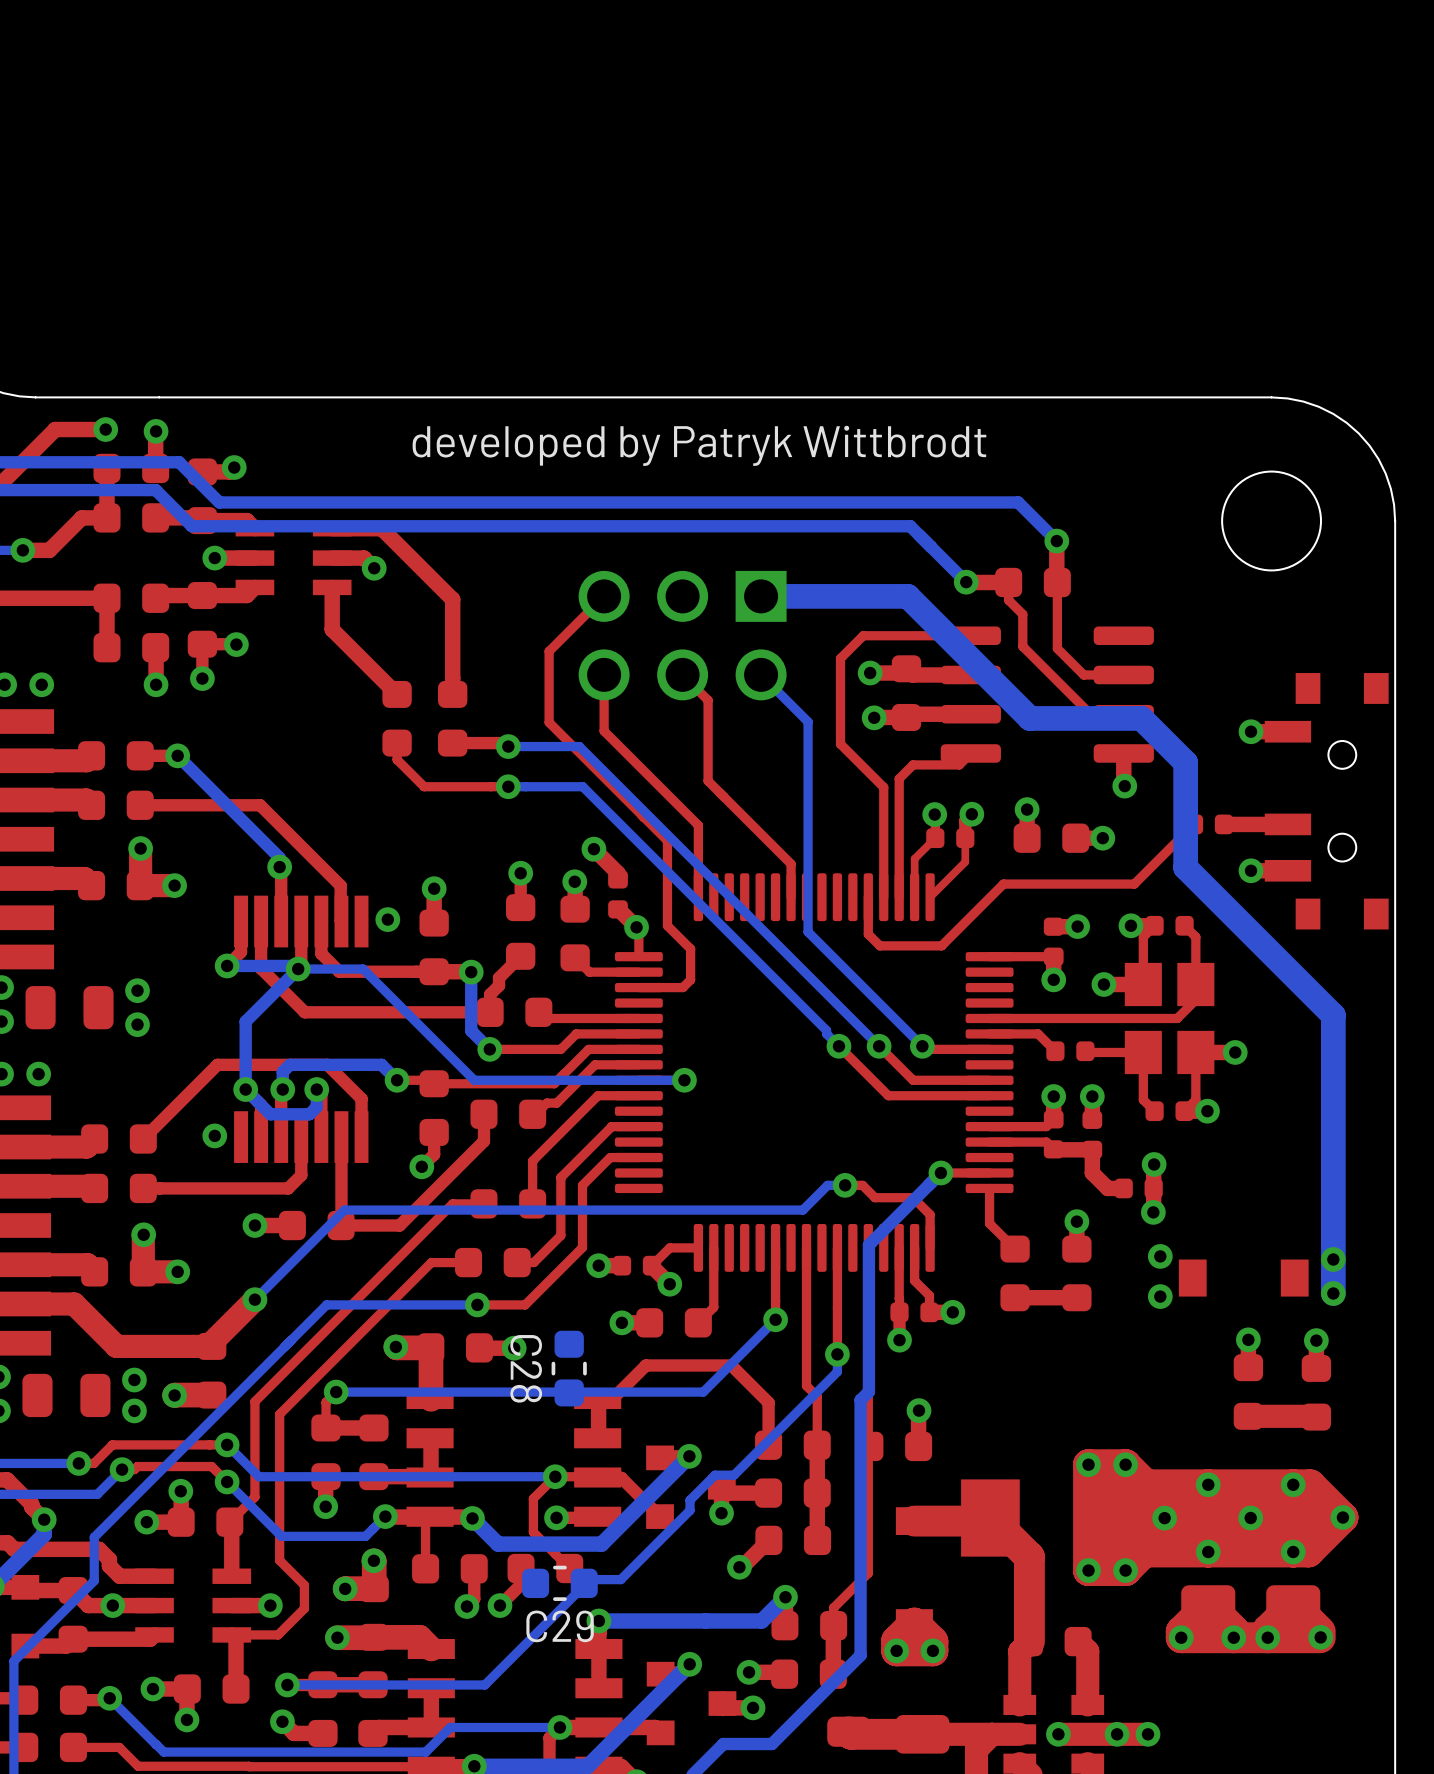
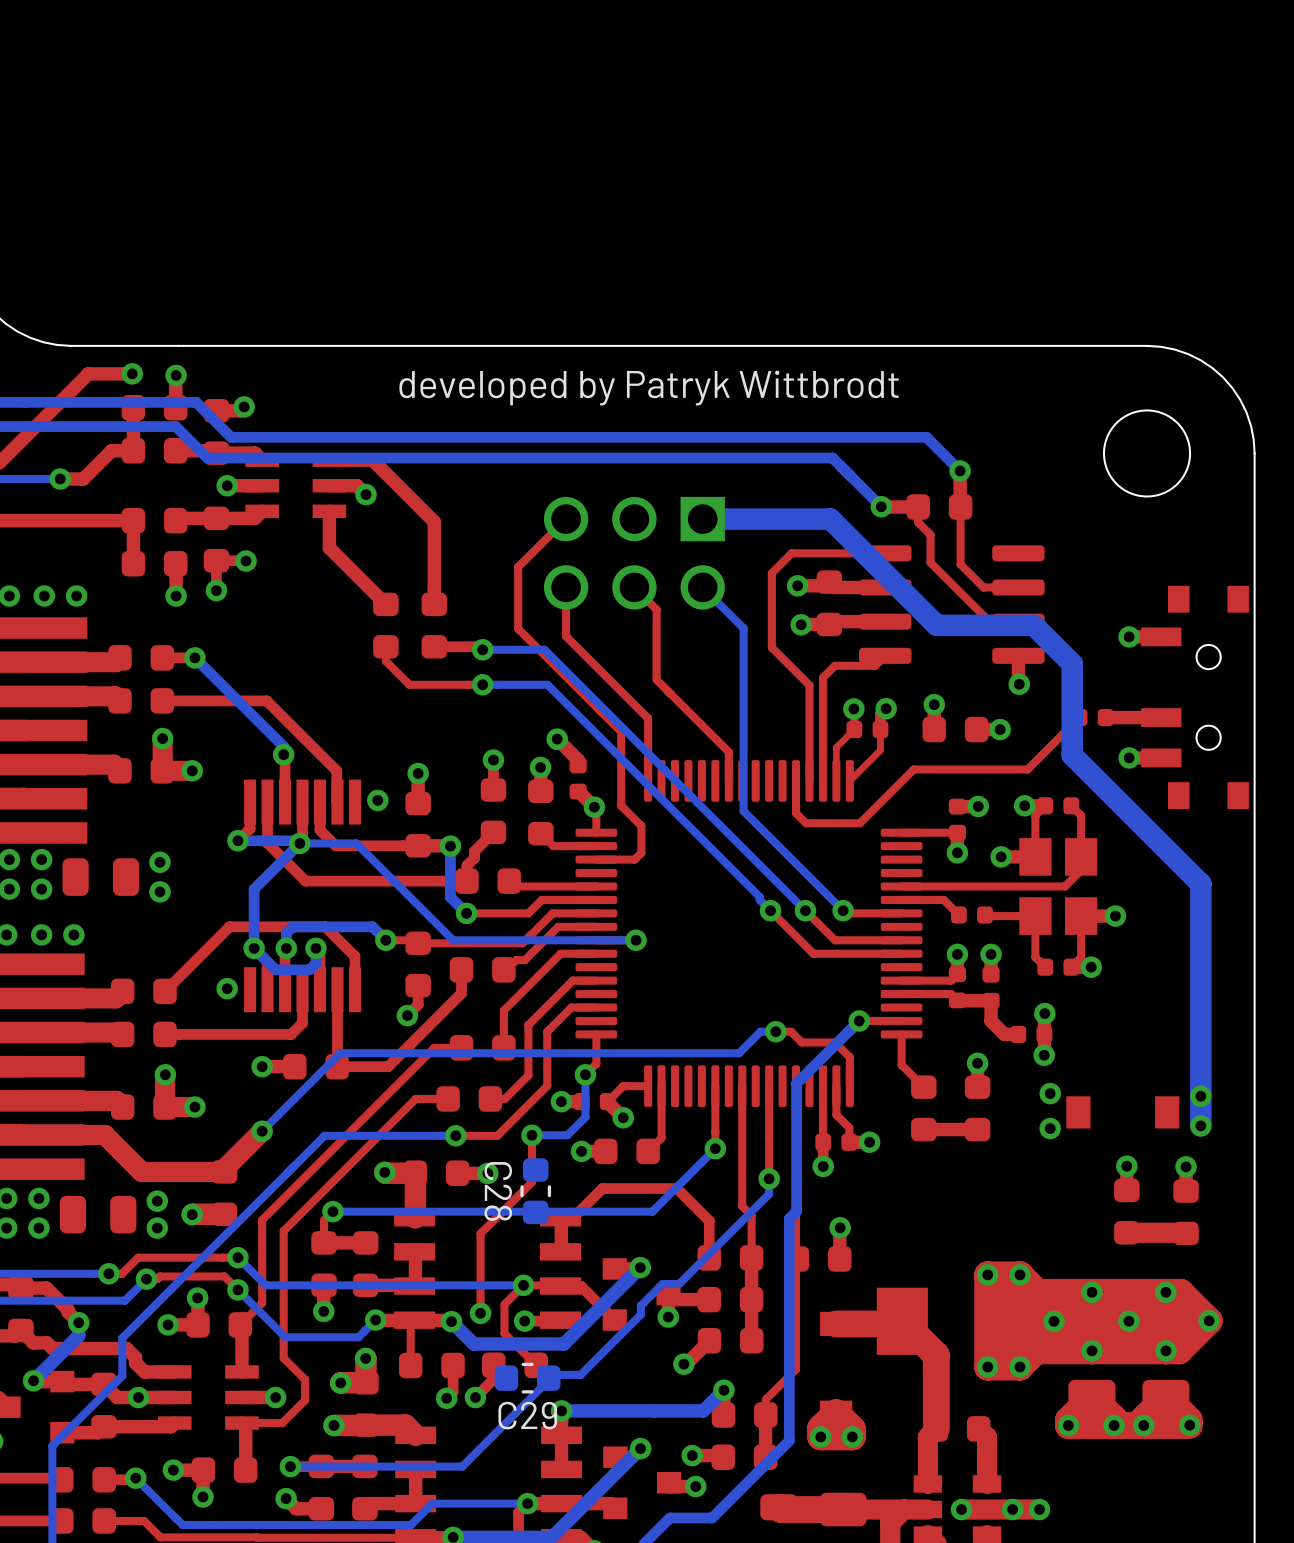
top track: none -> (596, 1034) (596, 1063) (585, 1074)
bottom track: none -> (585, 1074) (585, 1117) (567, 1135) (531, 1135)
via: none -> (585, 1074)
top track: none -> (531, 1135) (531, 1182) (480, 1233) (480, 1313)
via: none -> (531, 1135)
via: none -> (480, 1313)

